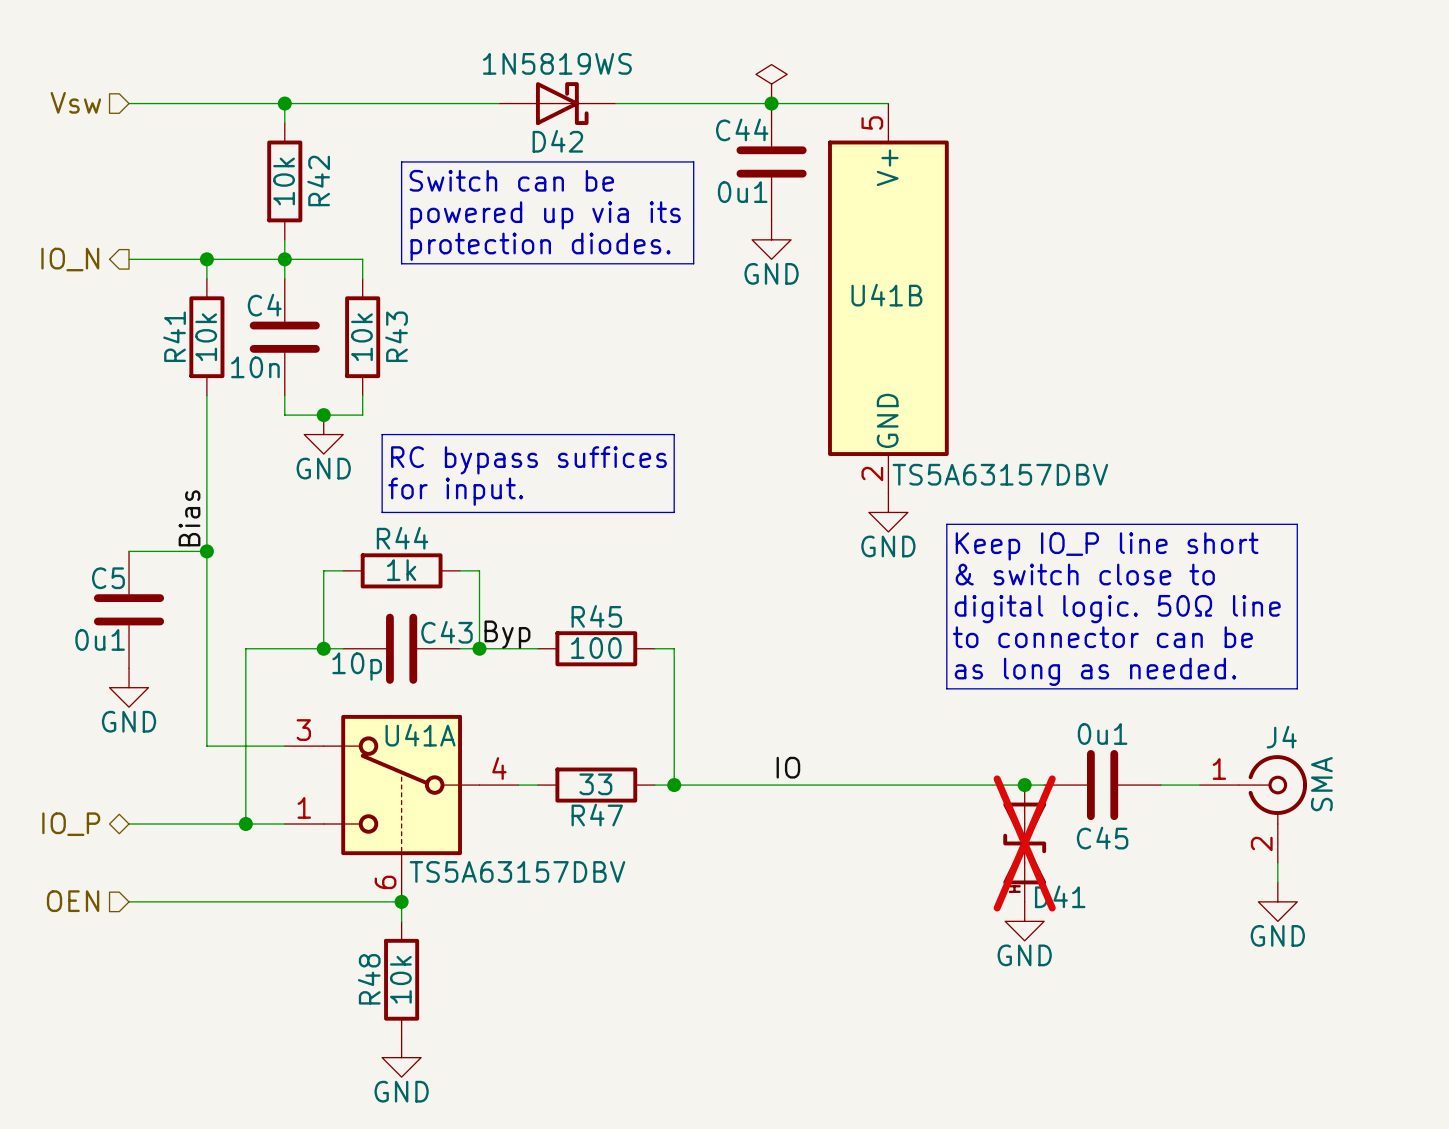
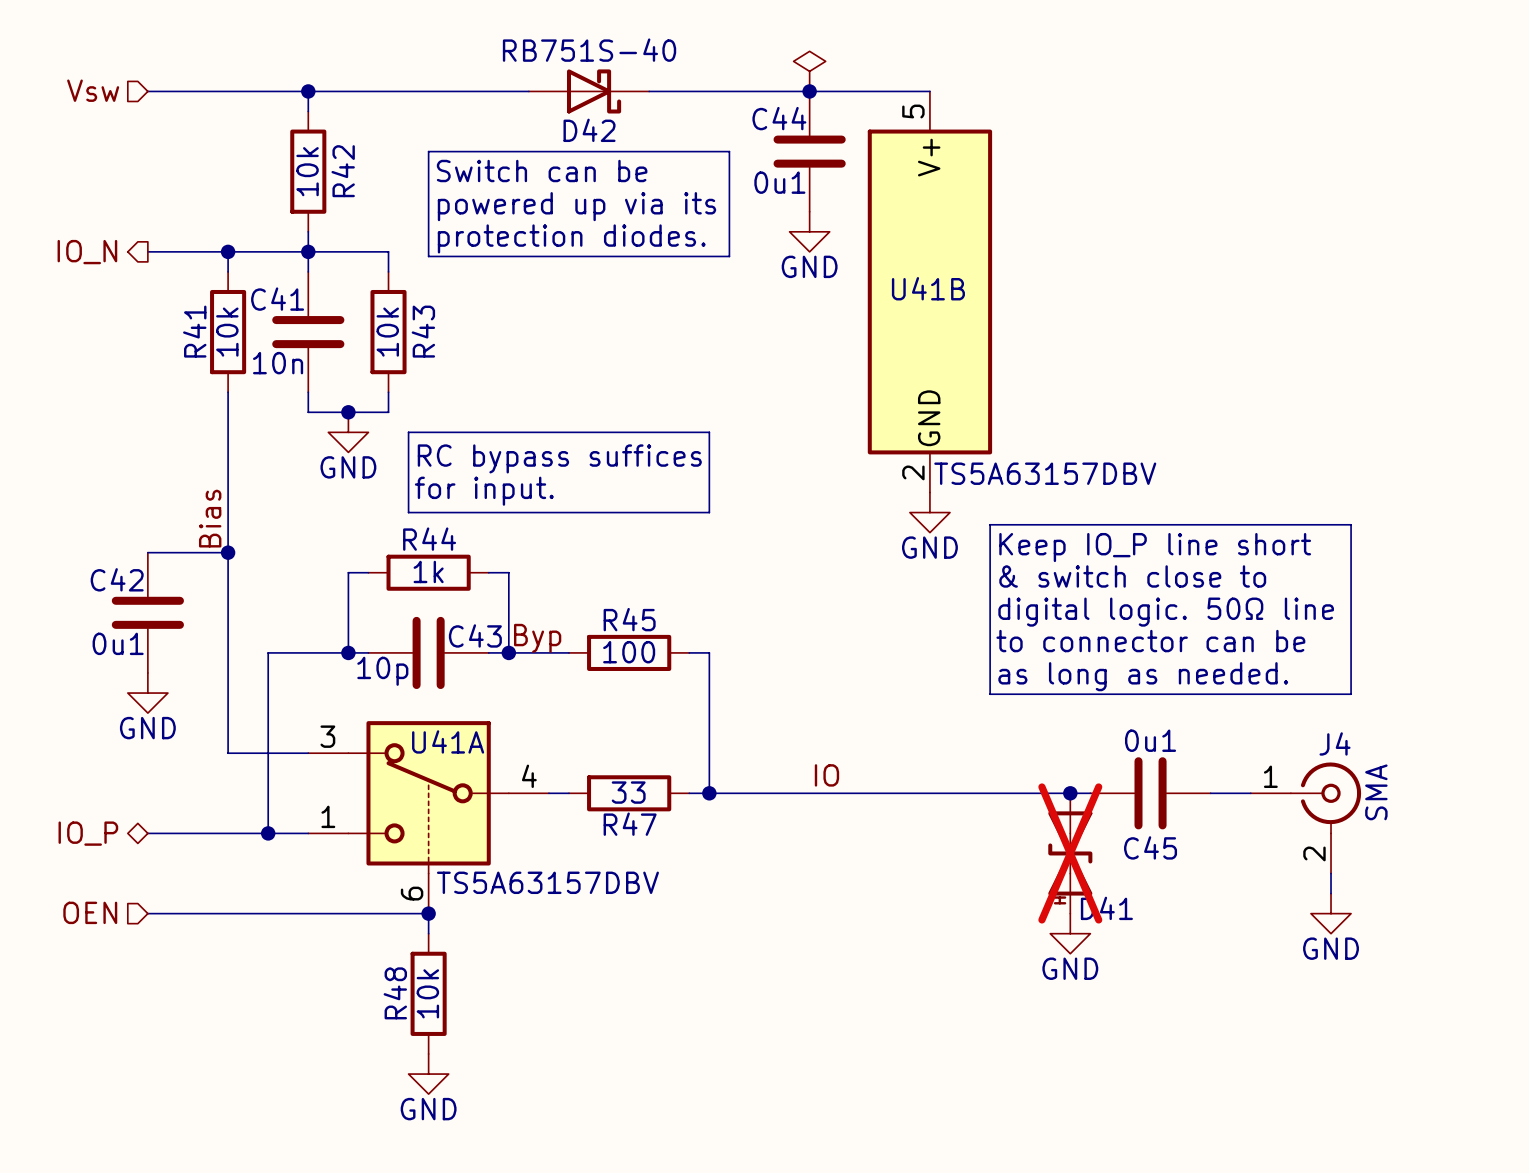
D42 value: 1N5819WS (557, 63) -> RB751S-40 (589, 50)
C4 name: C4 (264, 305) -> C41 (277, 299)
C5 name: C5 (108, 578) -> C42 (117, 579)

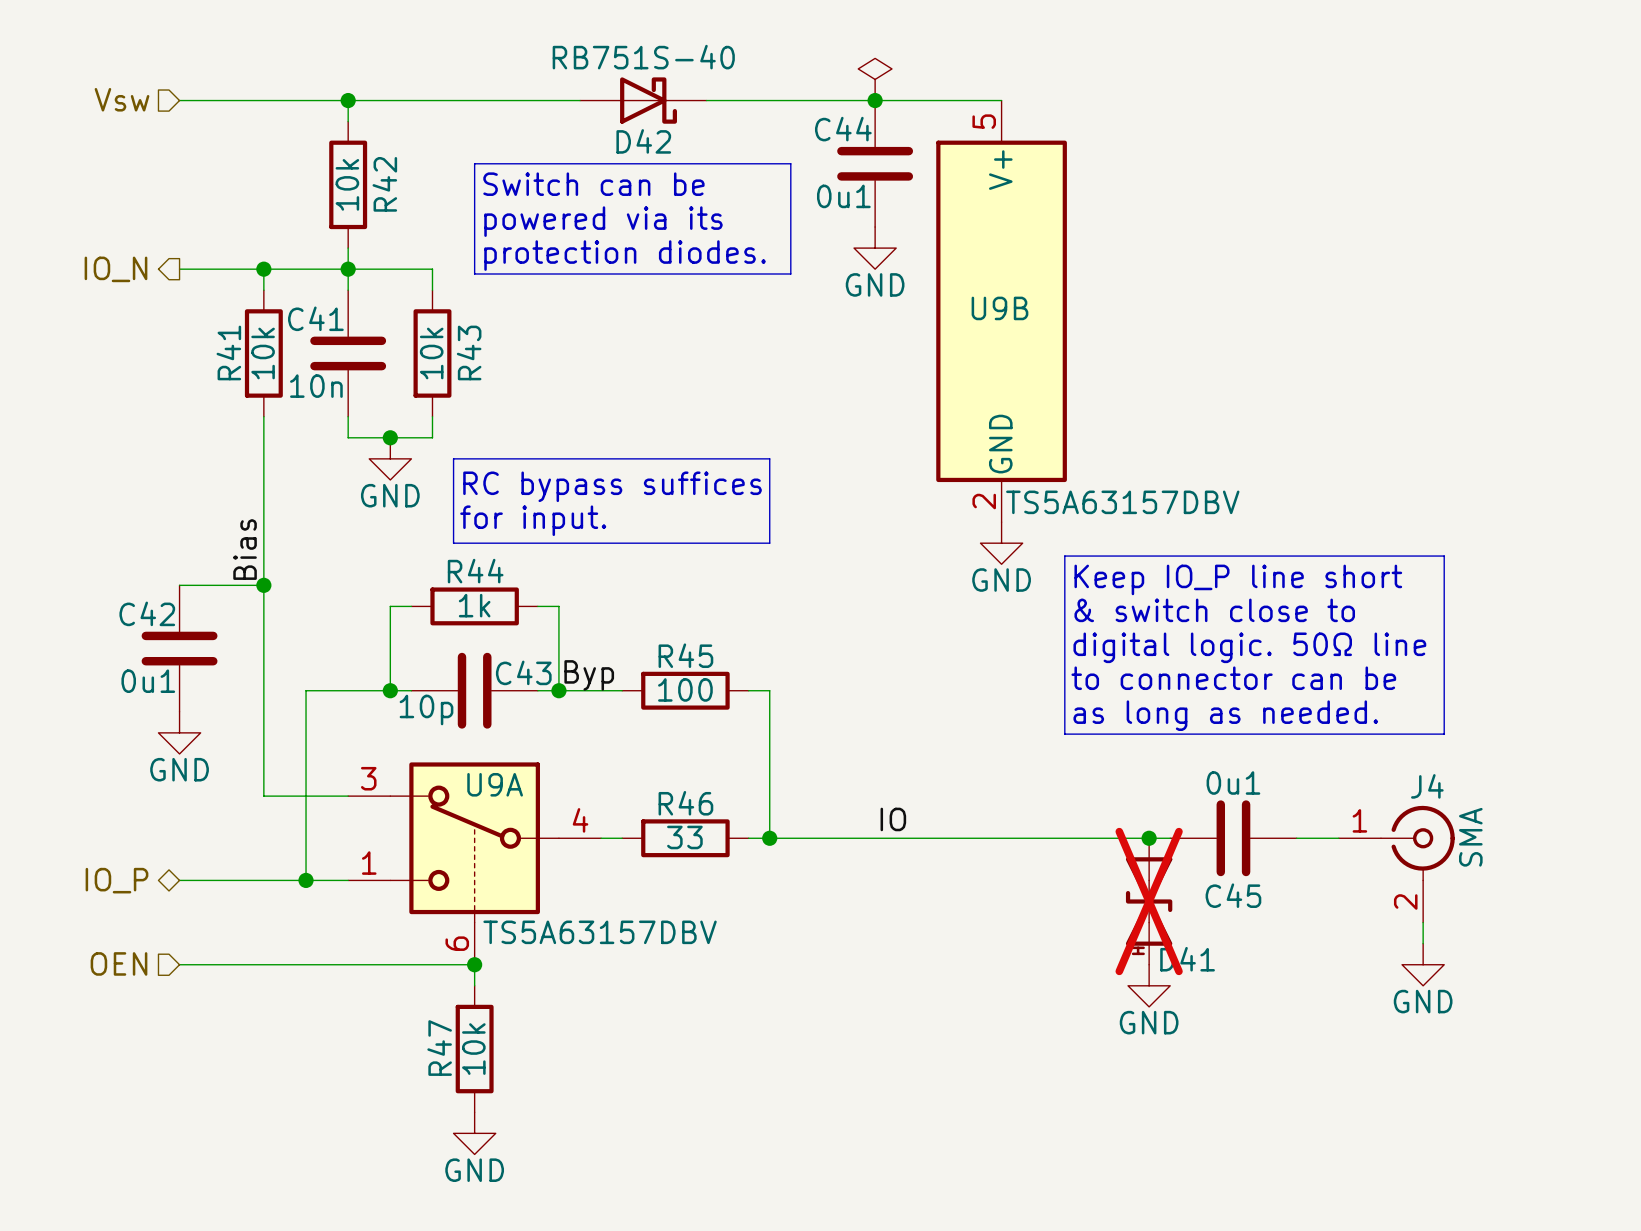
text: powered up via its (576, 206) -> powered via its (603, 221)
U41B name: U41B (928, 288) -> U9B (999, 308)
U41A name: U41A (448, 741) -> U9A (495, 784)
R47 name: R47 (630, 824) -> R46 (685, 803)
R48 name: R48 (395, 993) -> R47 (439, 1048)

